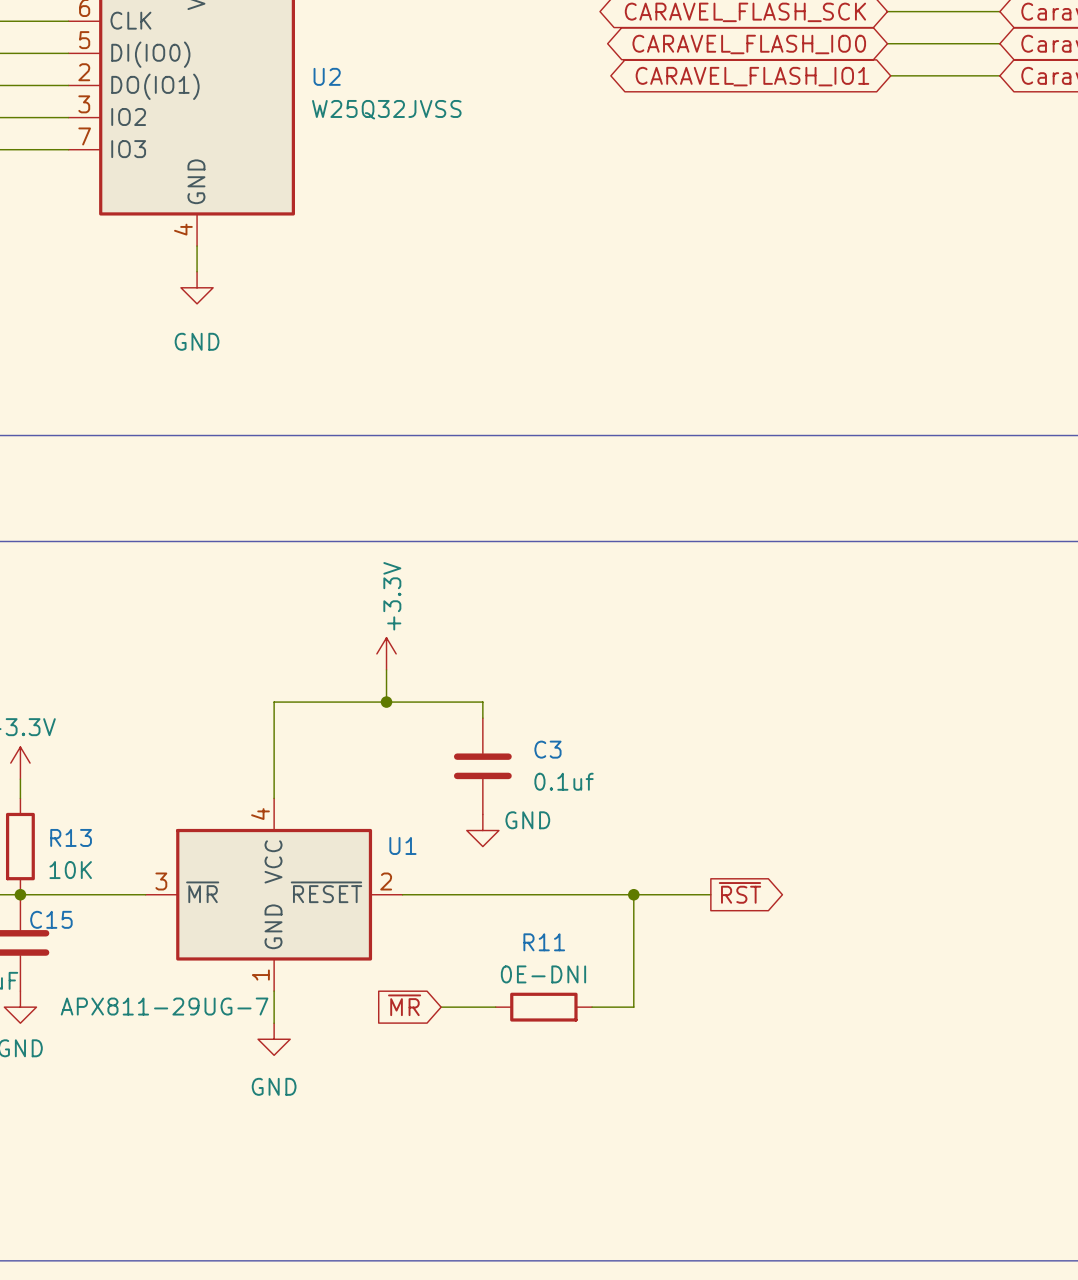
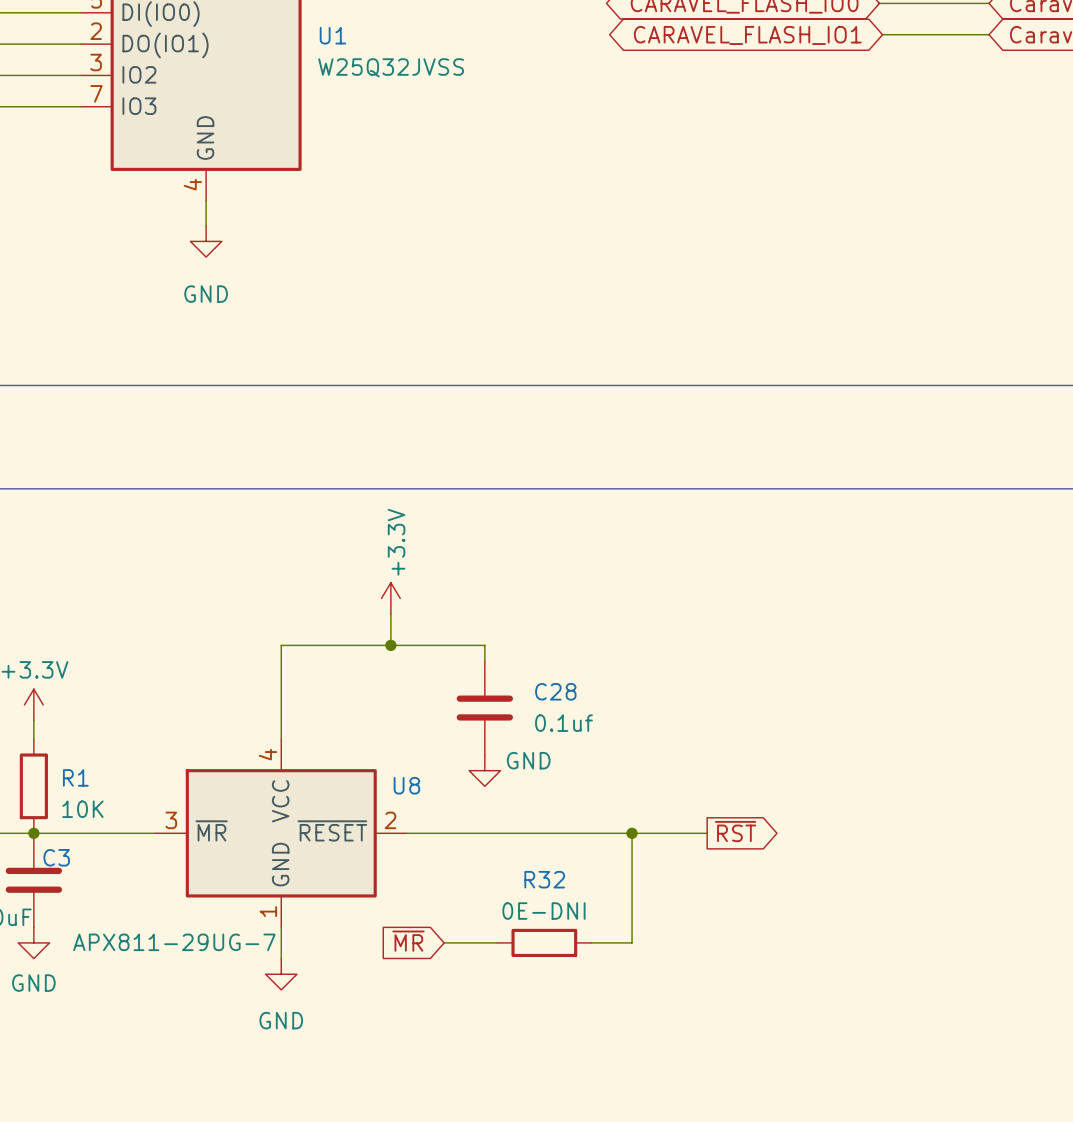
U2 name: U2 (327, 76) -> U1 (332, 35)
C3 name: C3 (547, 749) -> C28 (555, 691)
R13 name: R13 (71, 837) -> R1 (75, 777)
U1 name: U1 (402, 845) -> U8 (406, 785)
C15 name: C15 (51, 919) -> C3 (56, 857)
R11 name: R11 (544, 942) -> R32 (544, 879)

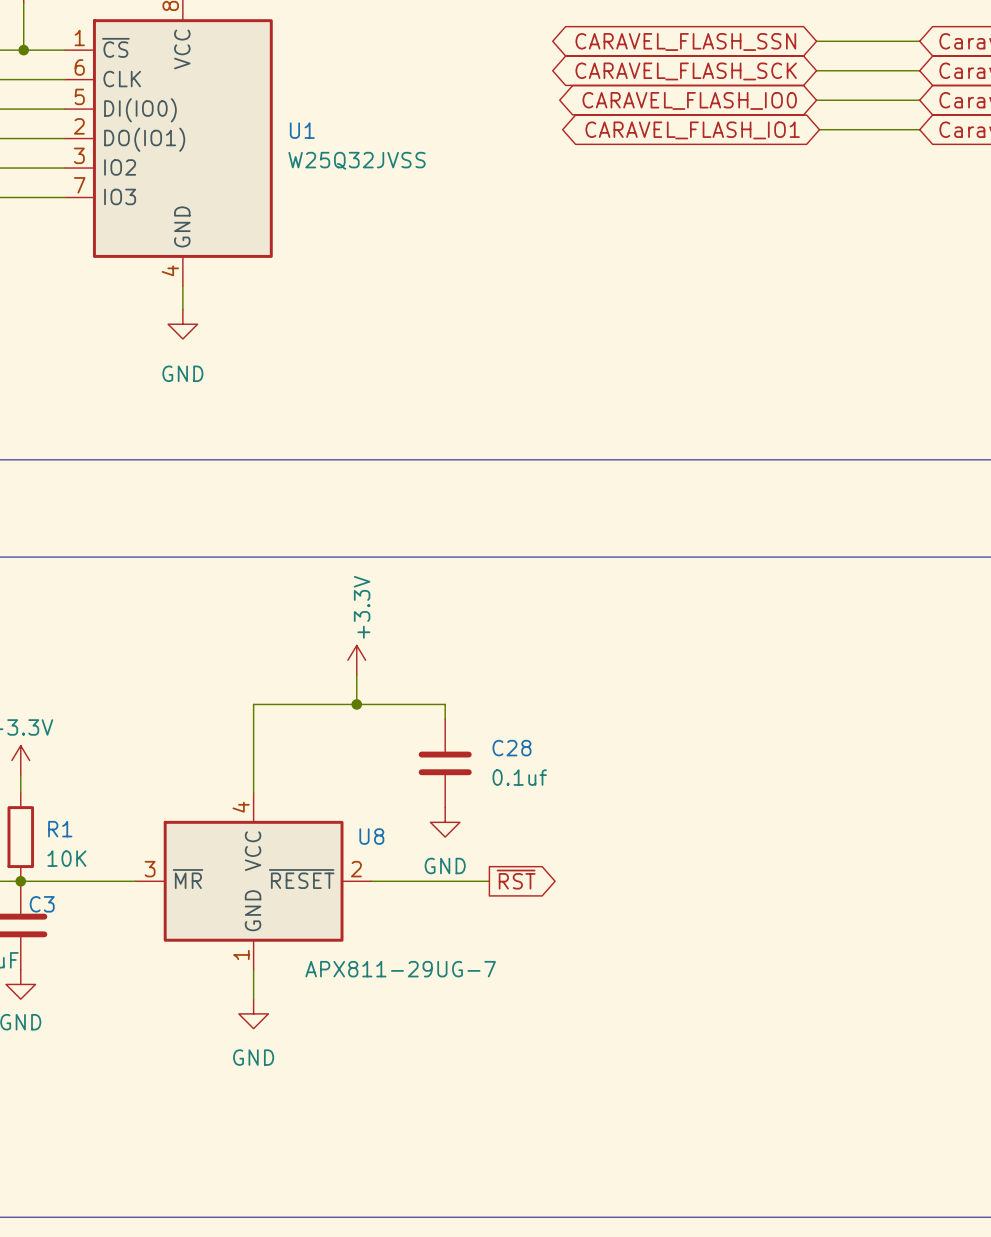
power symbol text position: GND (528, 760) -> GND (445, 866)
global label position: ~{RST} (735, 831) -> ~{RST} (516, 879)
wire: (531, 833) (707, 833) -> none
wire: (632, 833) (632, 942) (591, 942) -> none
junction: (632, 833) -> none
global label: ~{MR} (408, 941) -> none
U8 value position: APX811-29UG-7 (174, 942) -> APX811-29UG-7 (400, 969)
wire: (444, 942) (497, 942) -> none
R32: 0E-DNI (544, 942) -> none

